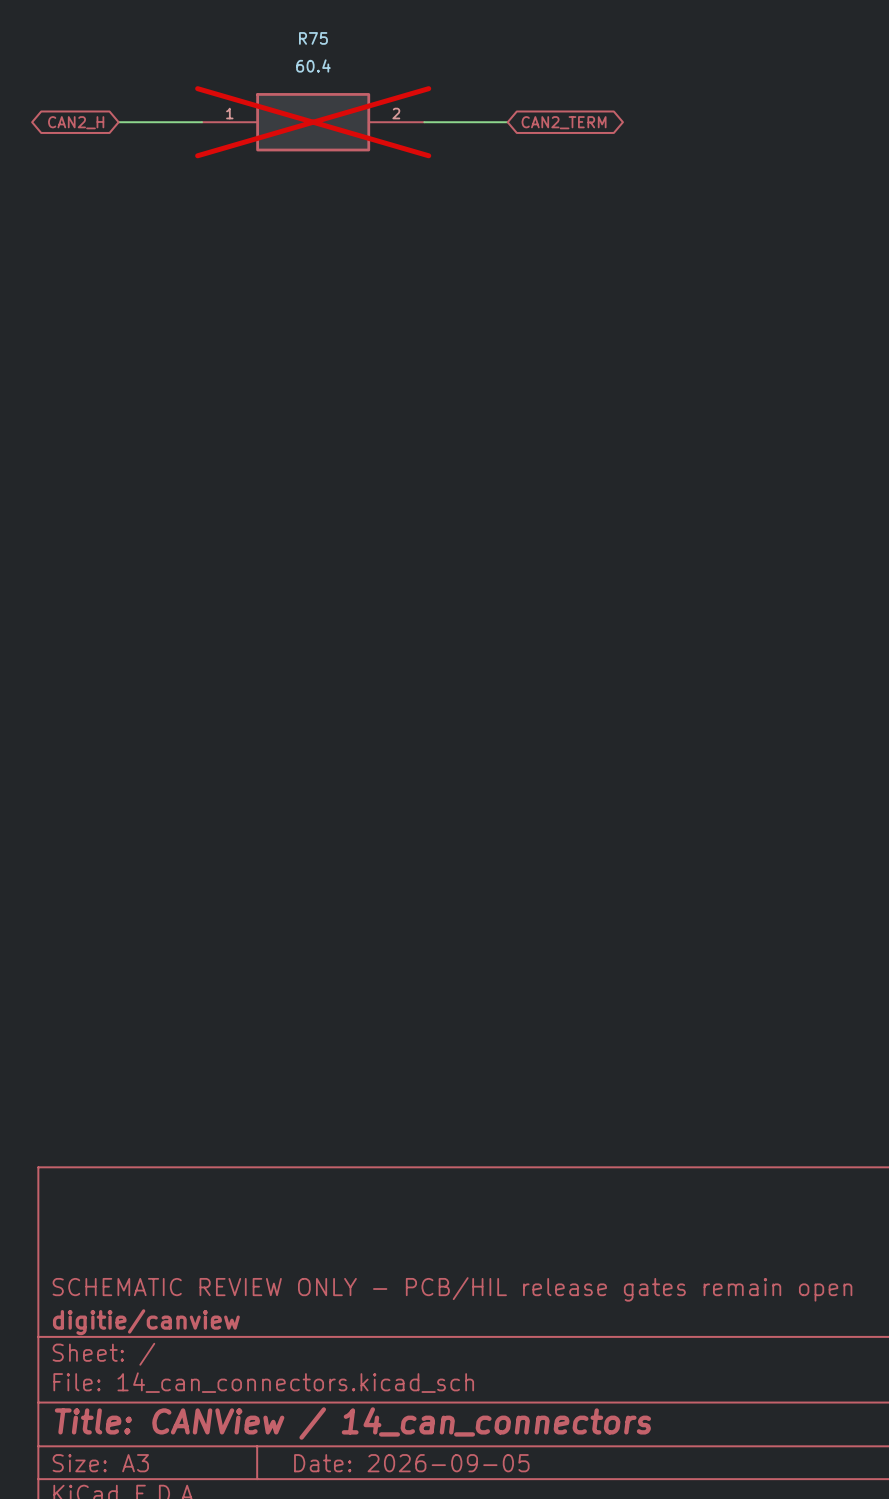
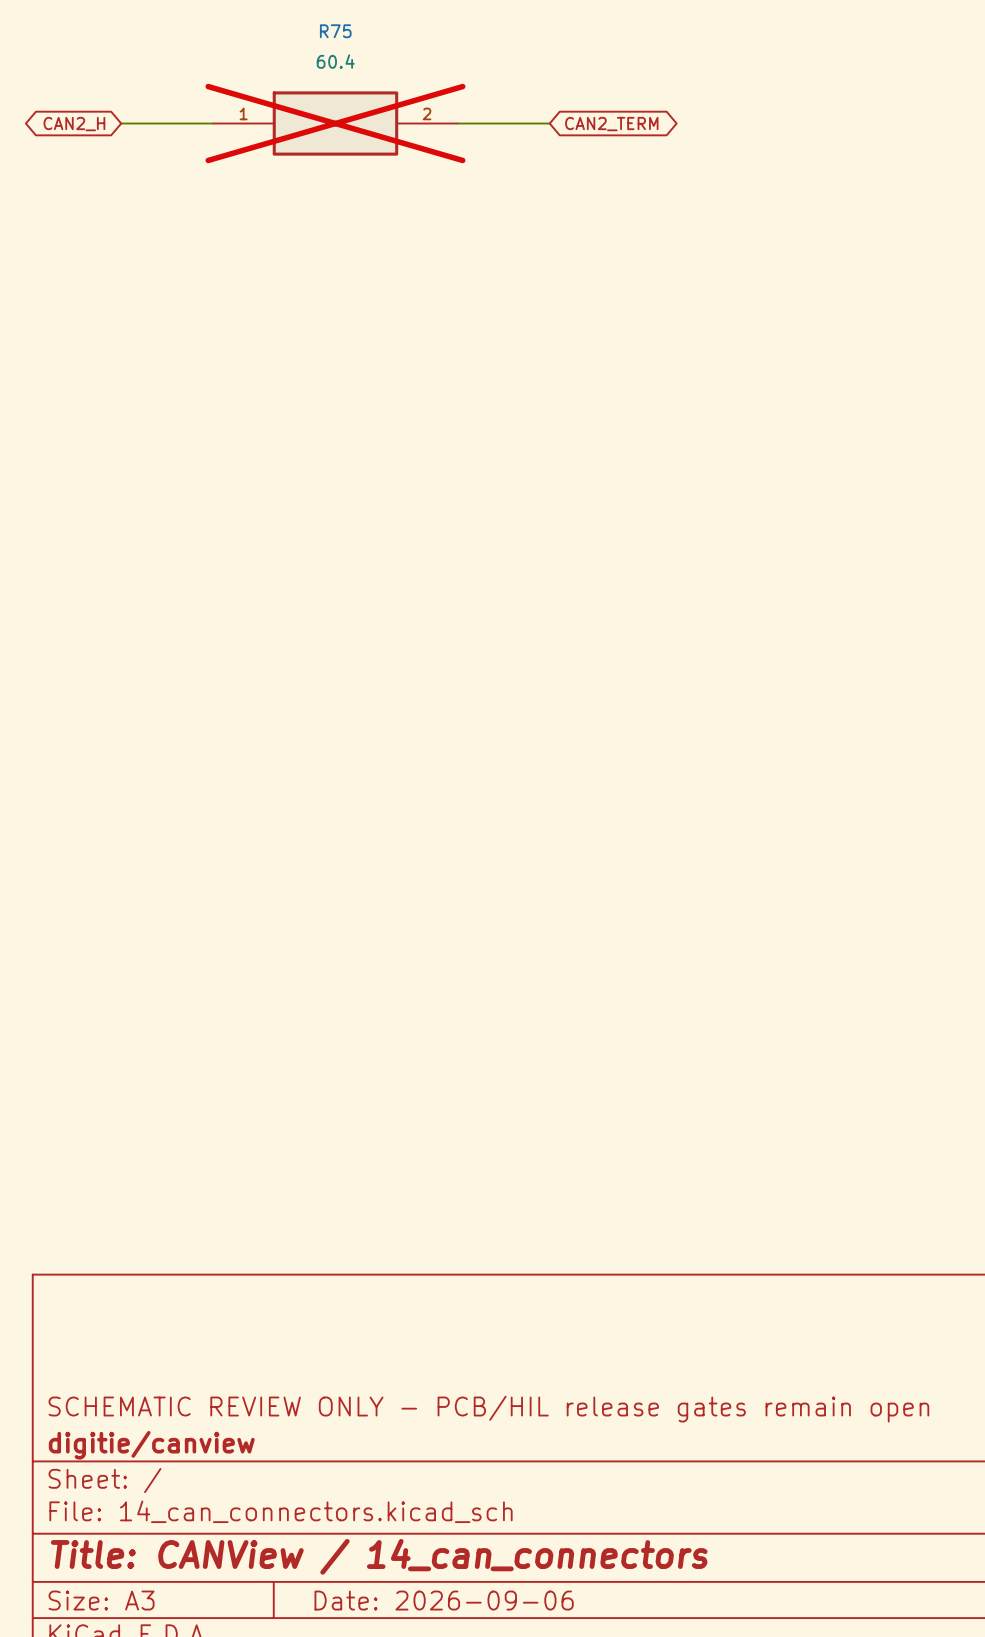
title block: Date: 2026-09-05 (411, 1463) -> Date: 2026-09-06 (444, 1600)

